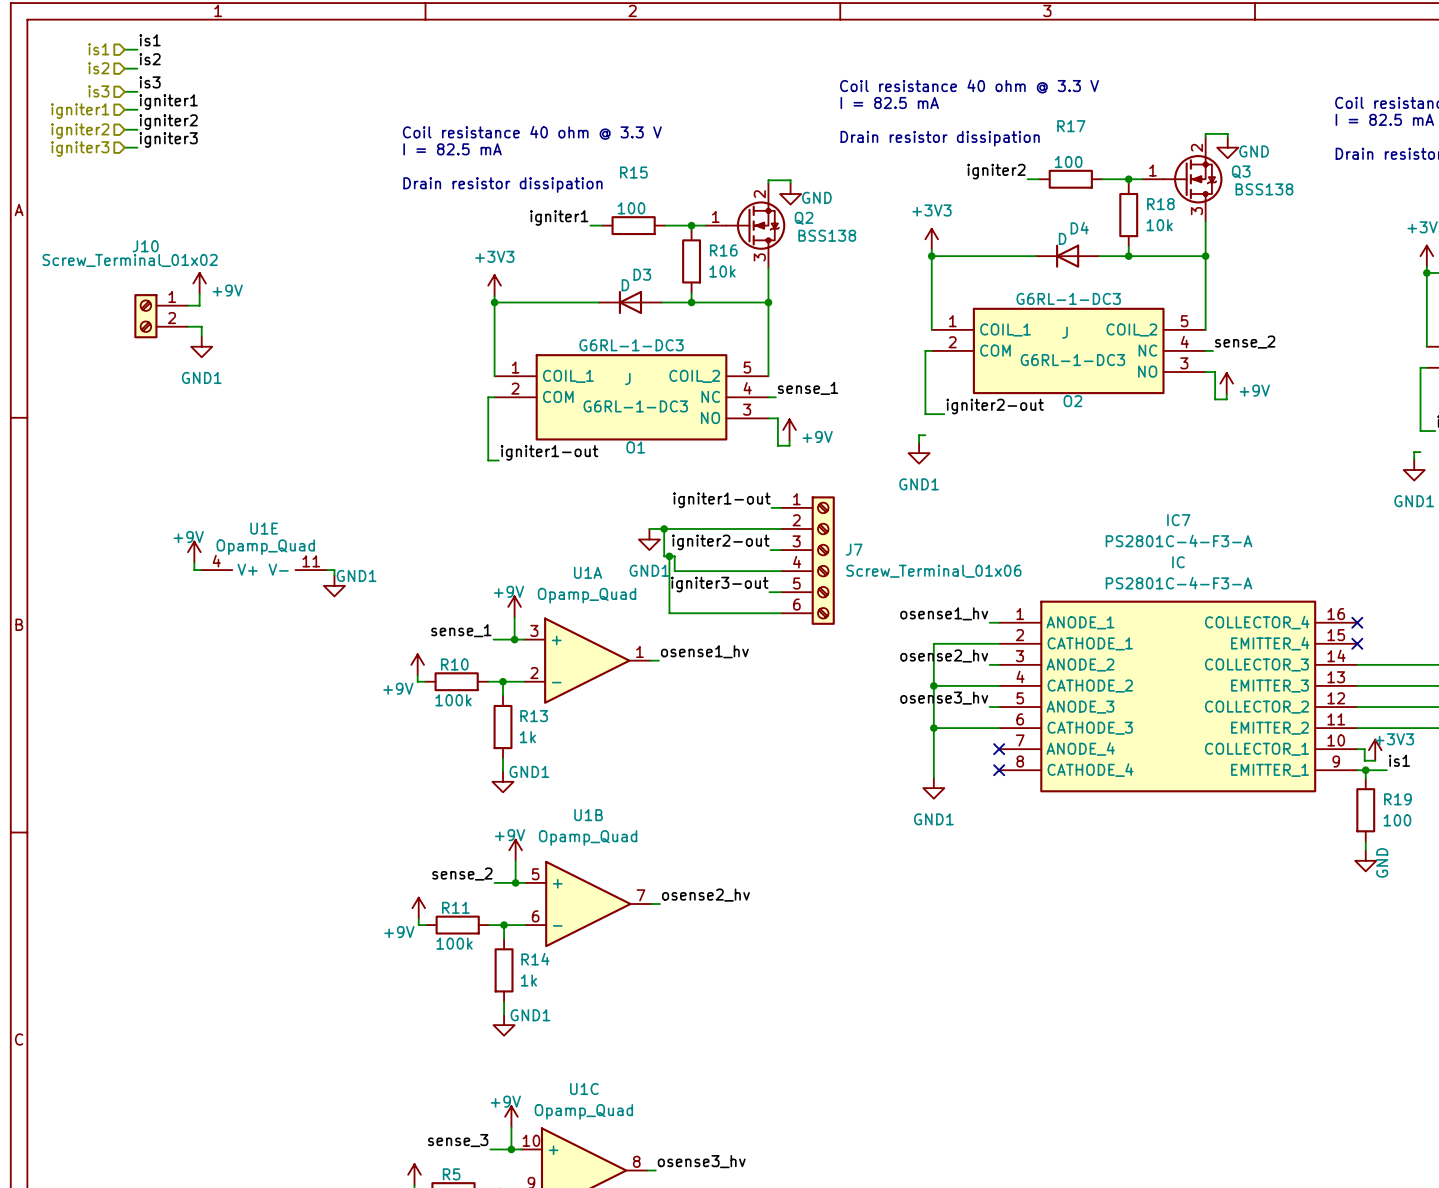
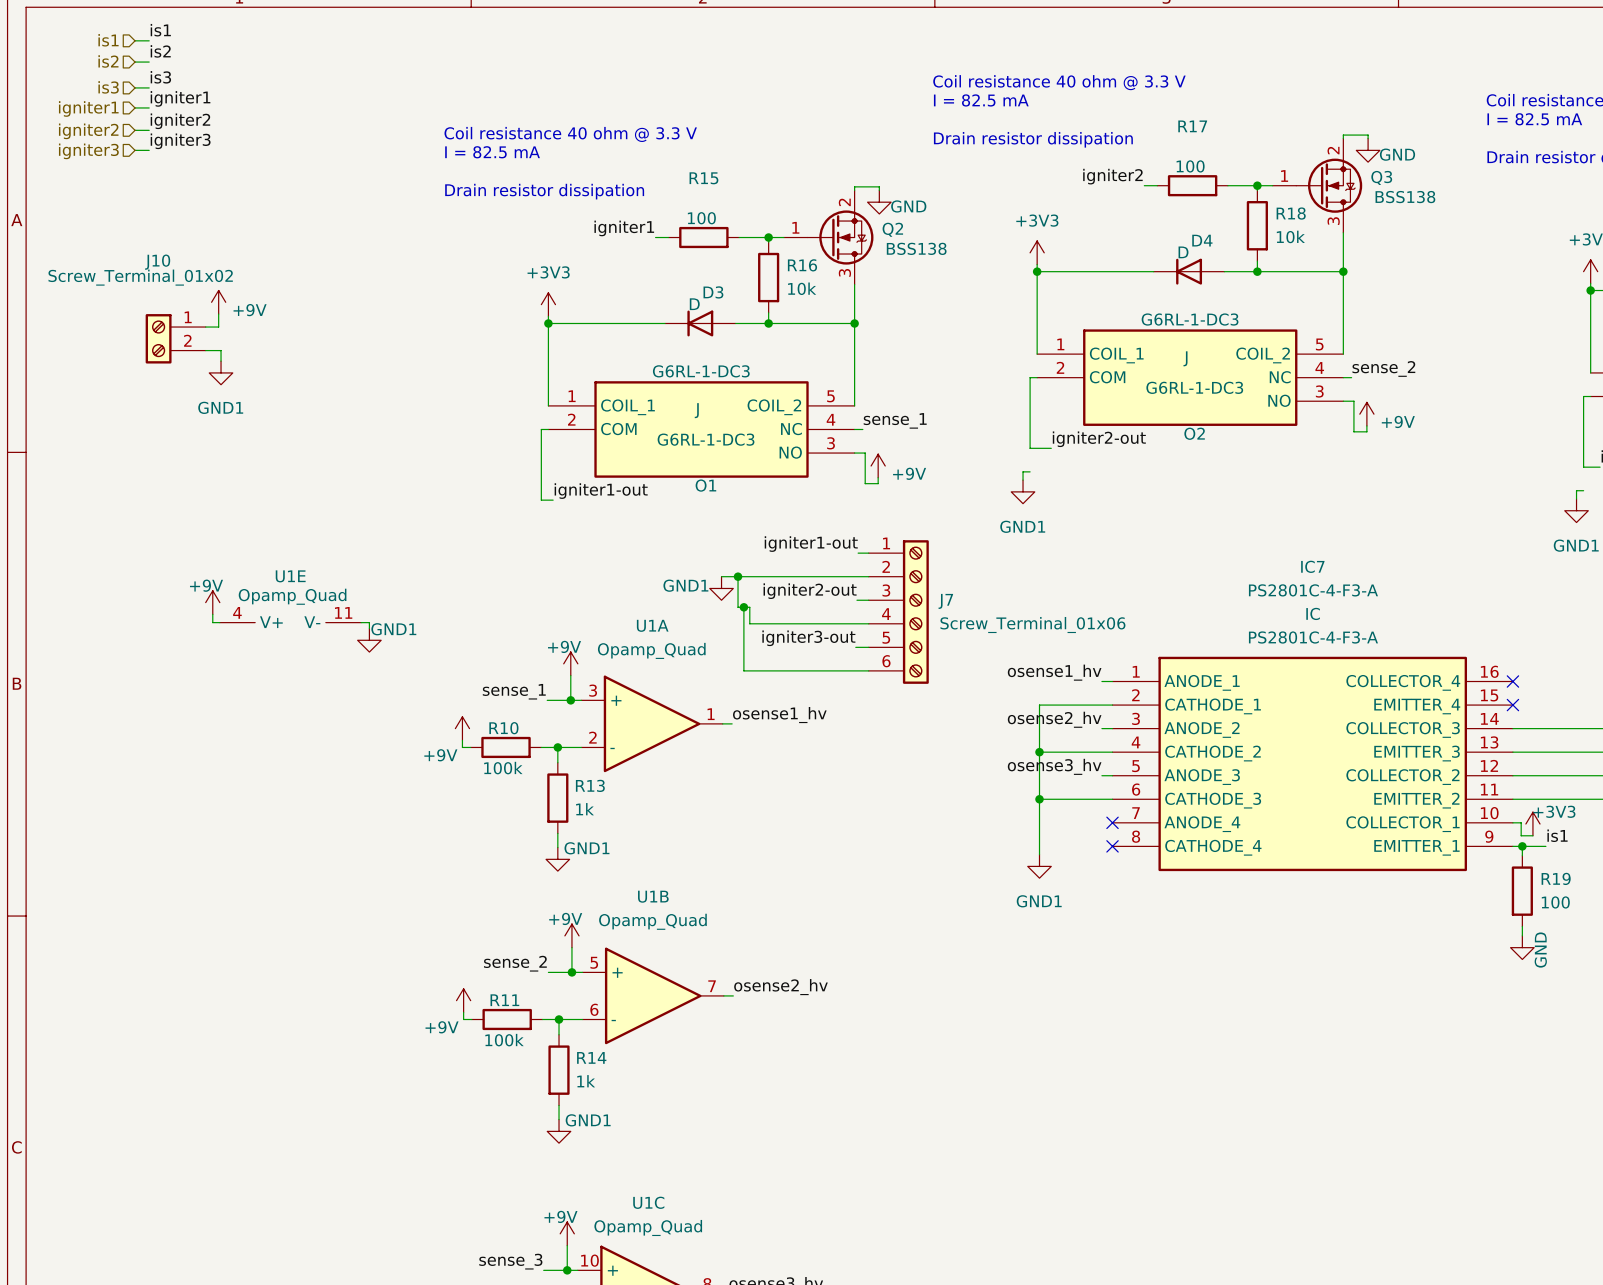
power symbol text position: GND1 (649, 570) -> GND1 (685, 585)

